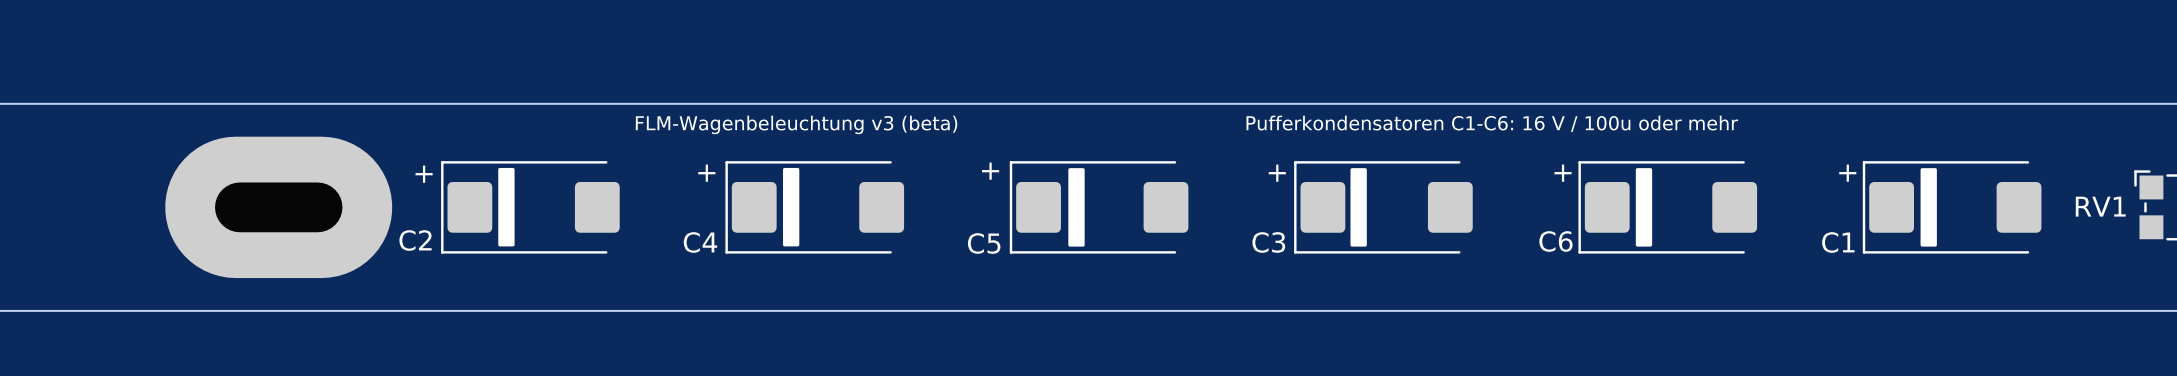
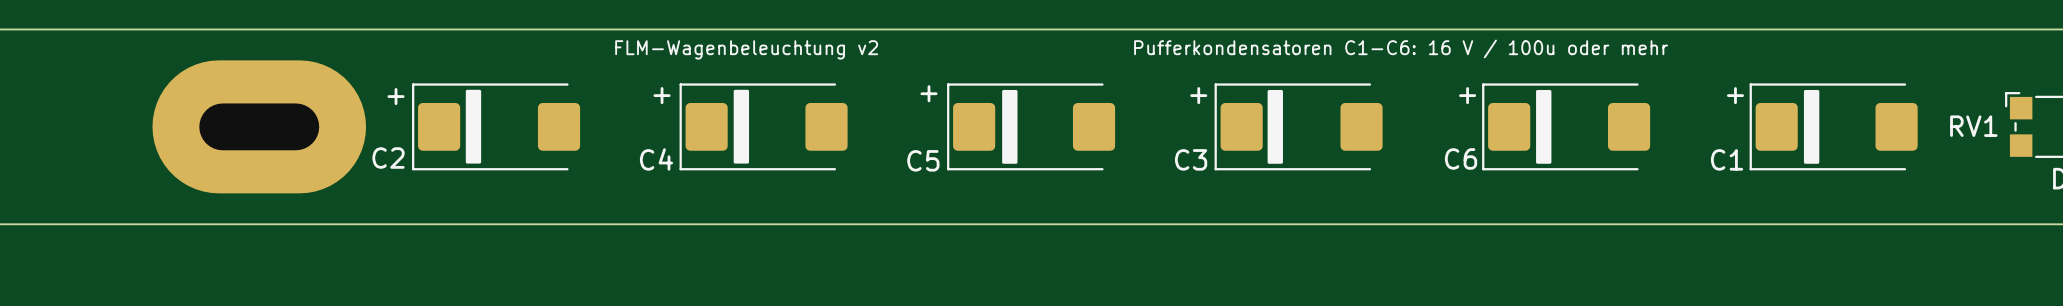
text: FLM-Wagenbeleuchtung v3 (beta) (796, 124) -> FLM-Wagenbeleuchtung v2 (746, 49)

